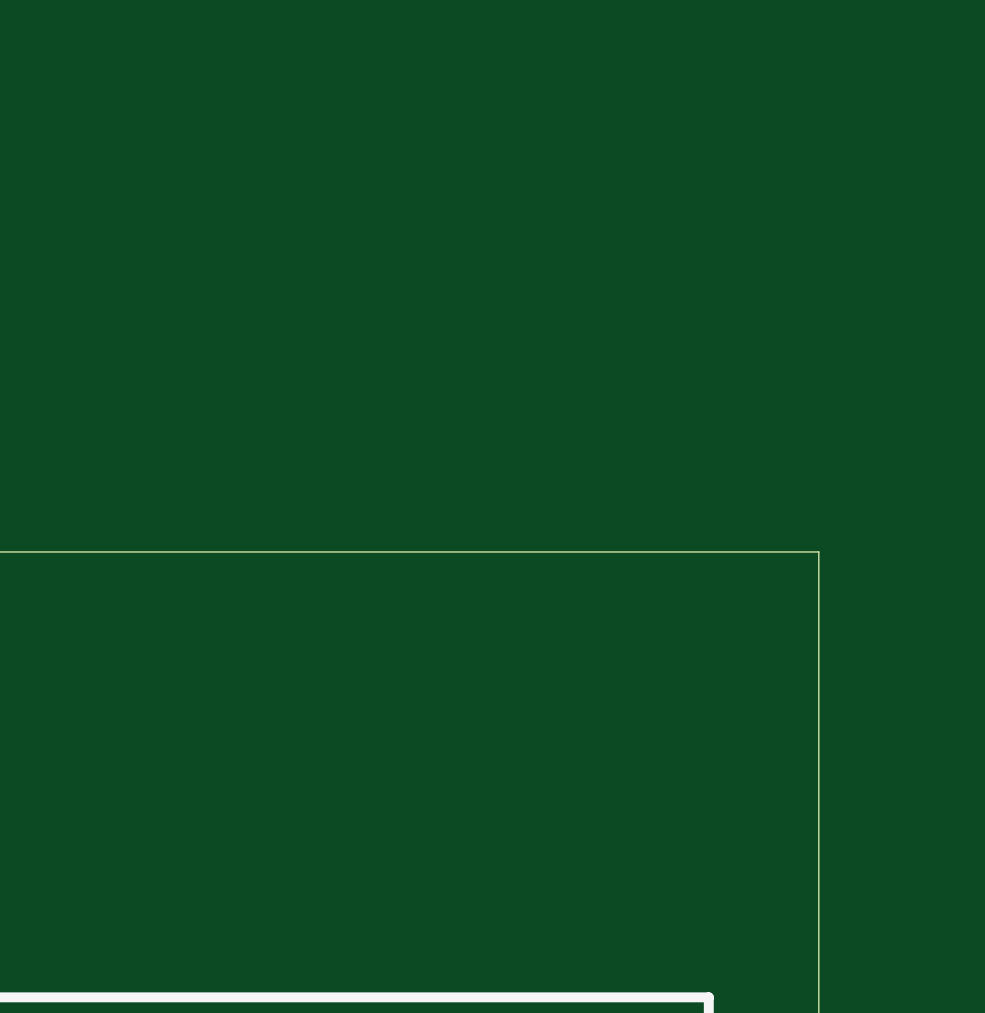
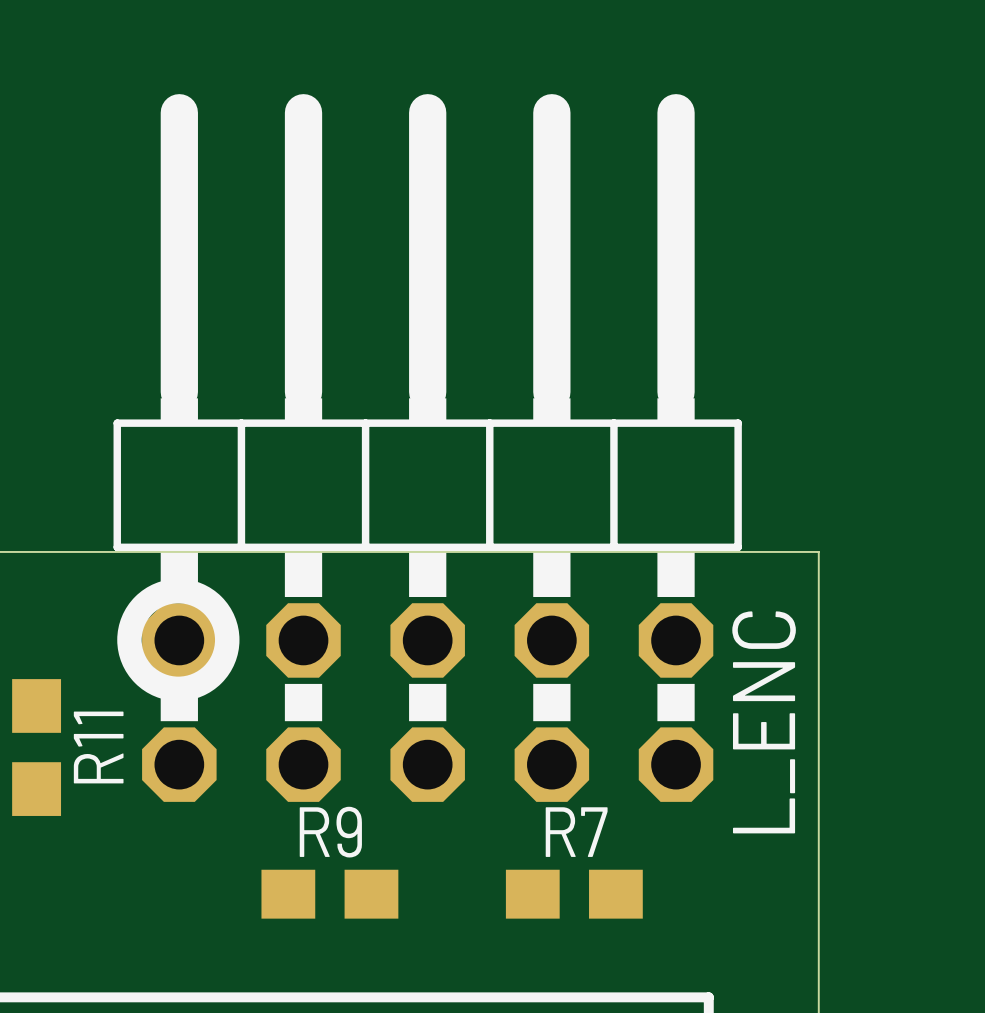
L_ENC: none -> (427, 447)
drawing: none -> [117, 578, 240, 702]
R11: none -> (36, 747)
R9: none -> (329, 894)
R7: none -> (574, 894)

